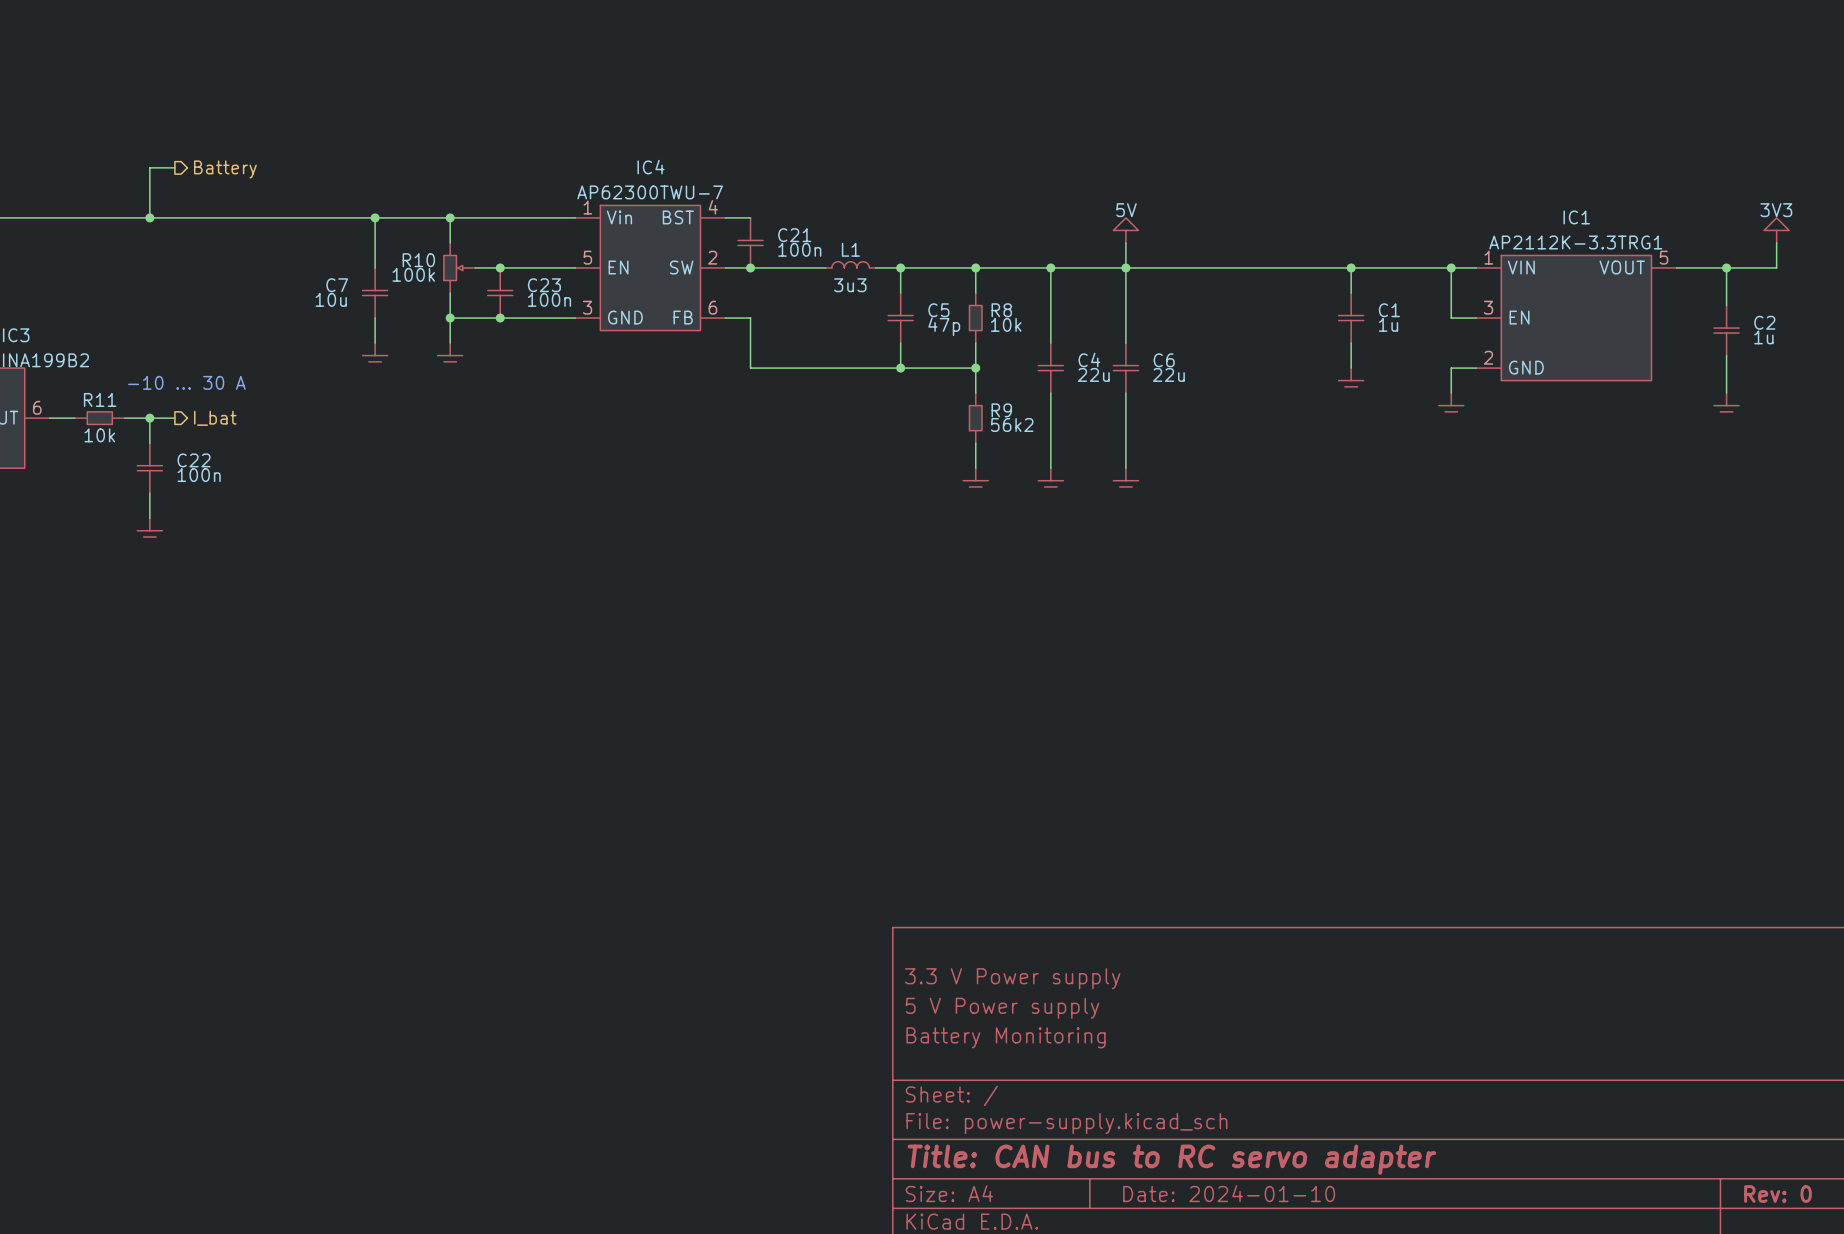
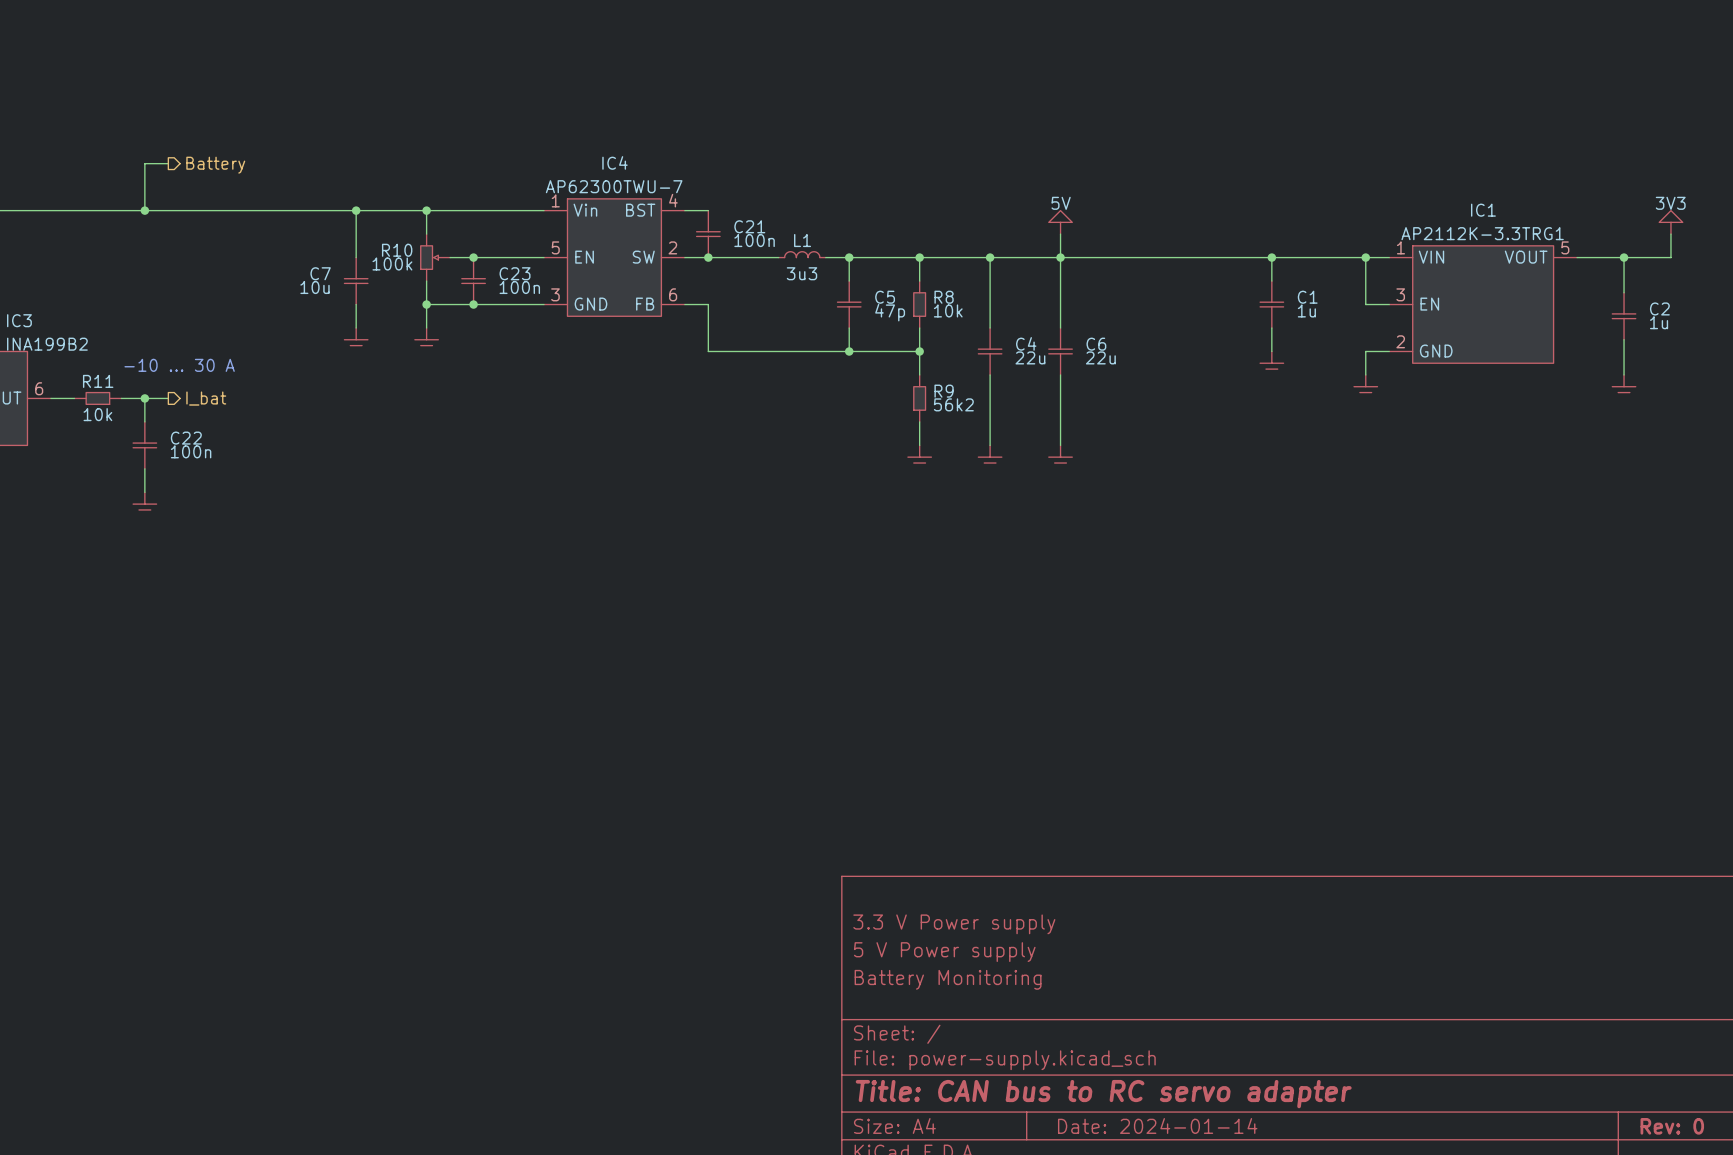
title block: Date: 2024-01-10 (1229, 1193) -> Date: 2024-01-14 (1157, 1125)

